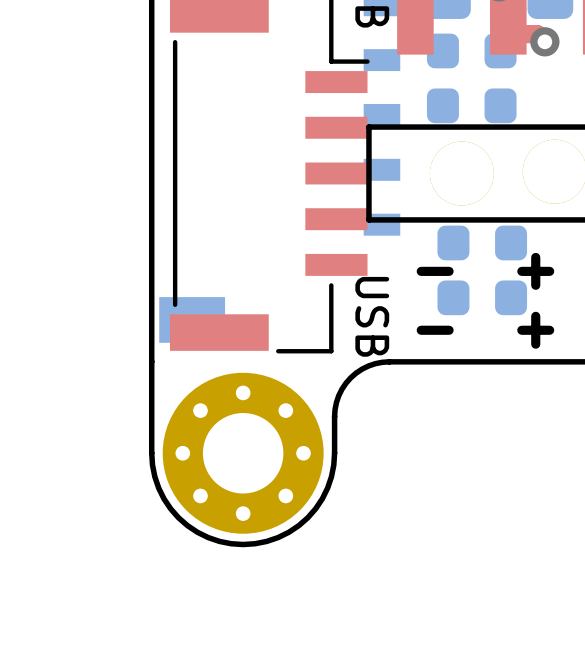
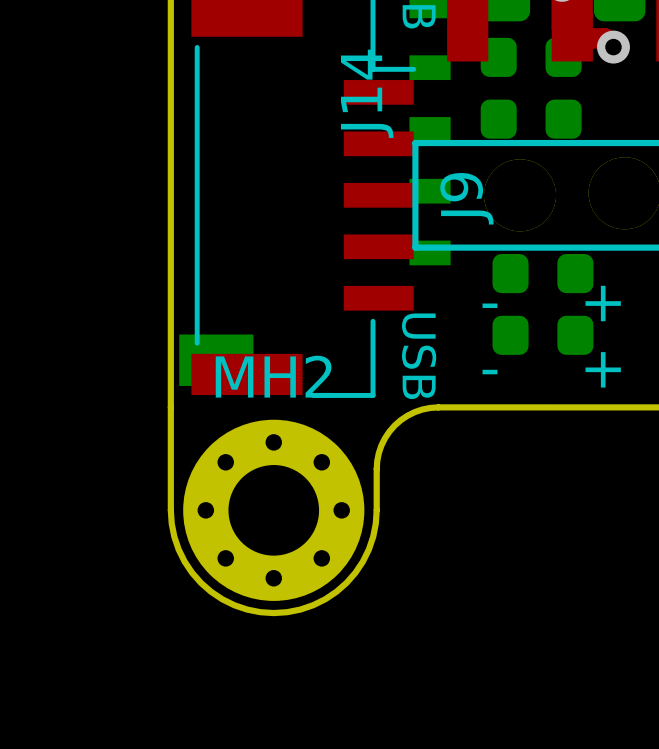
J14 name: none -> J14 (367, 93)
J9 name: none -> J9 (466, 198)
MH2 name: none -> MH2 (273, 376)

